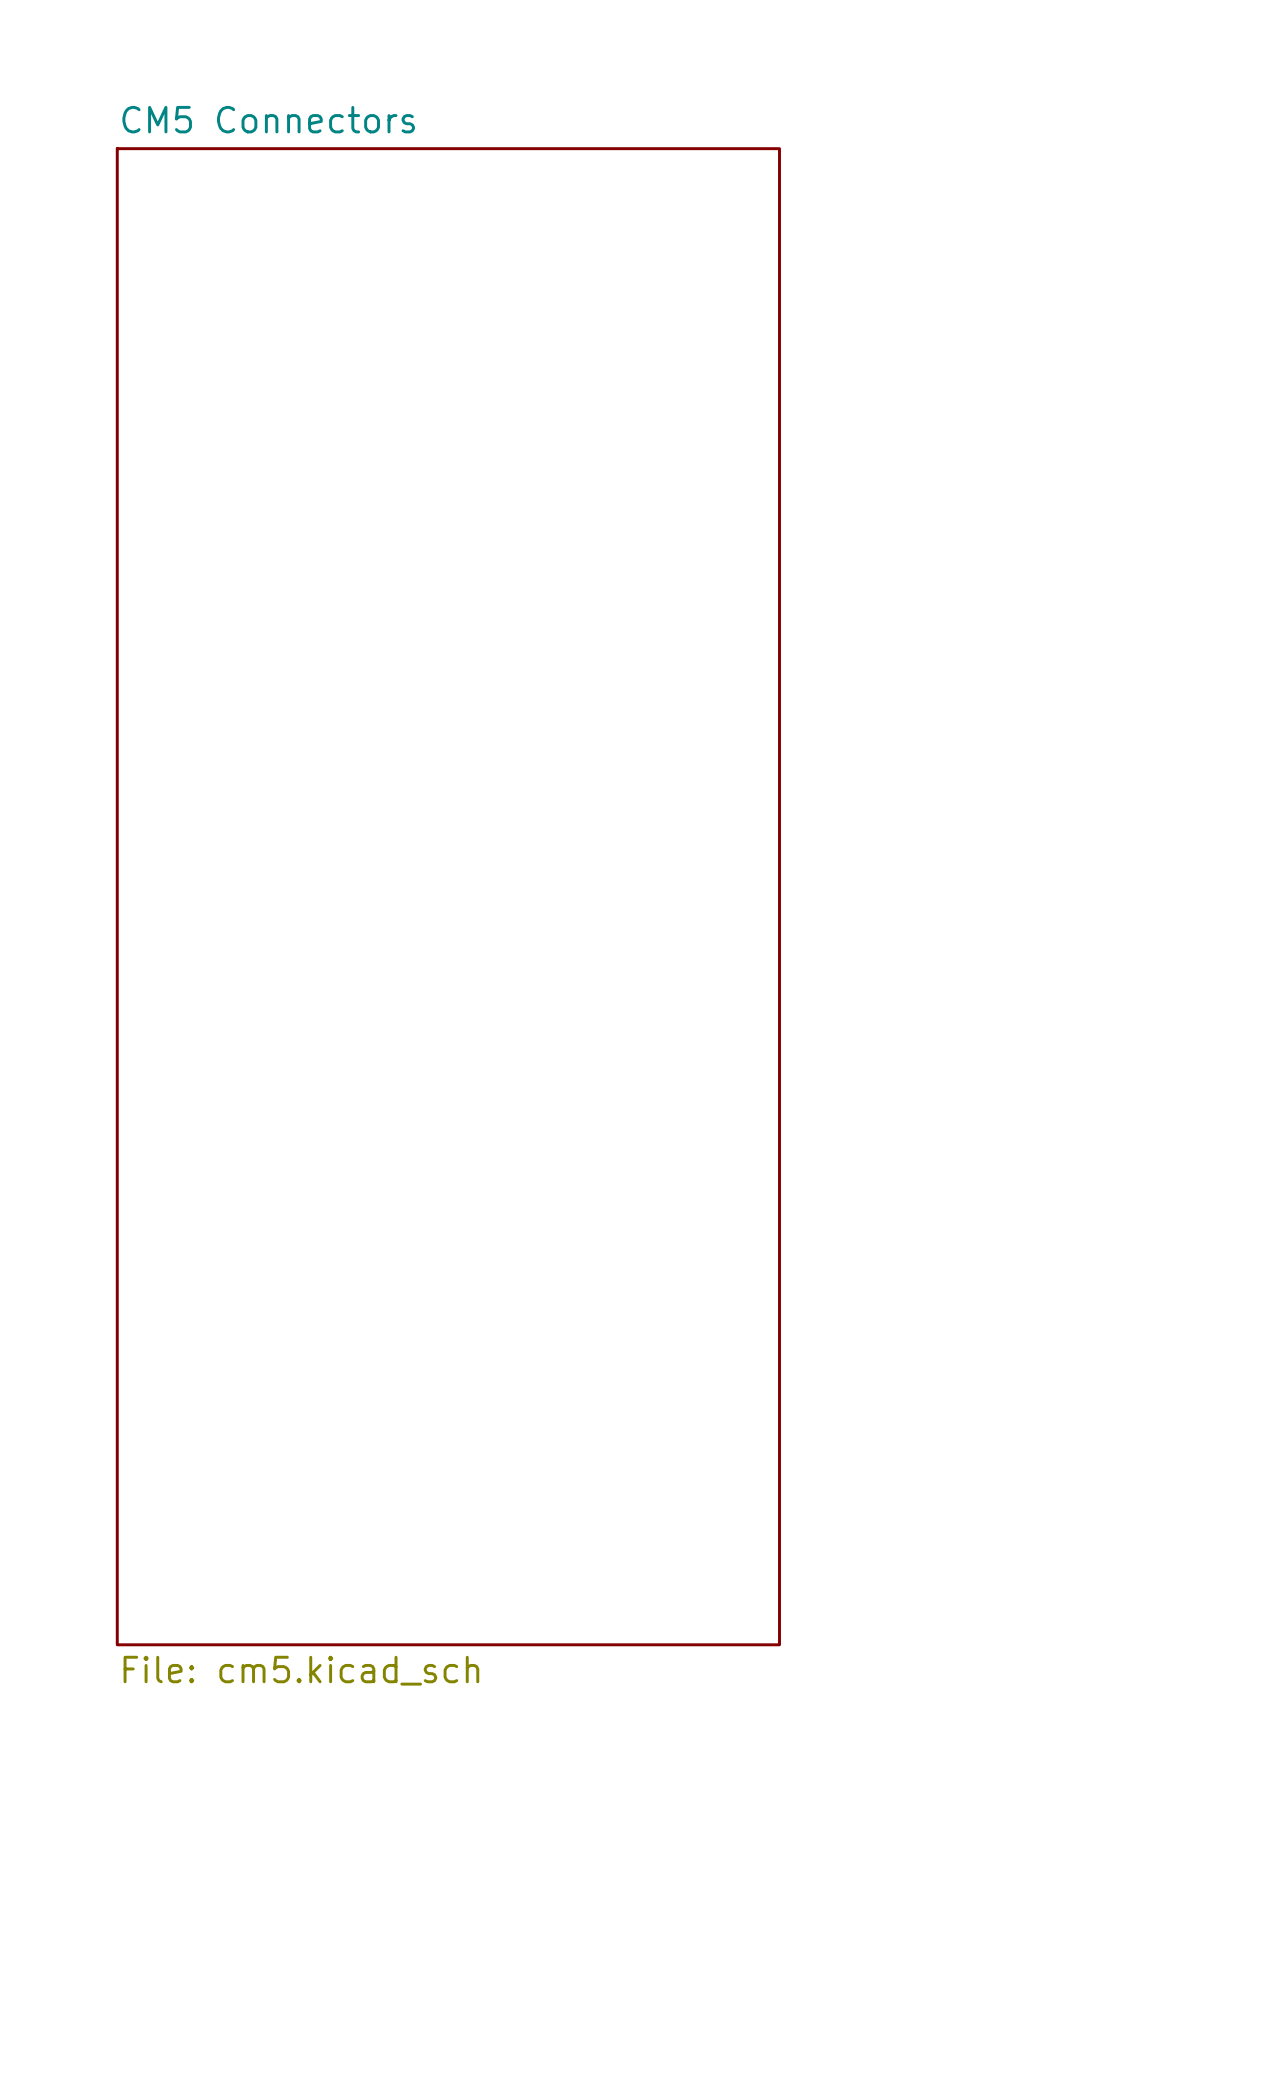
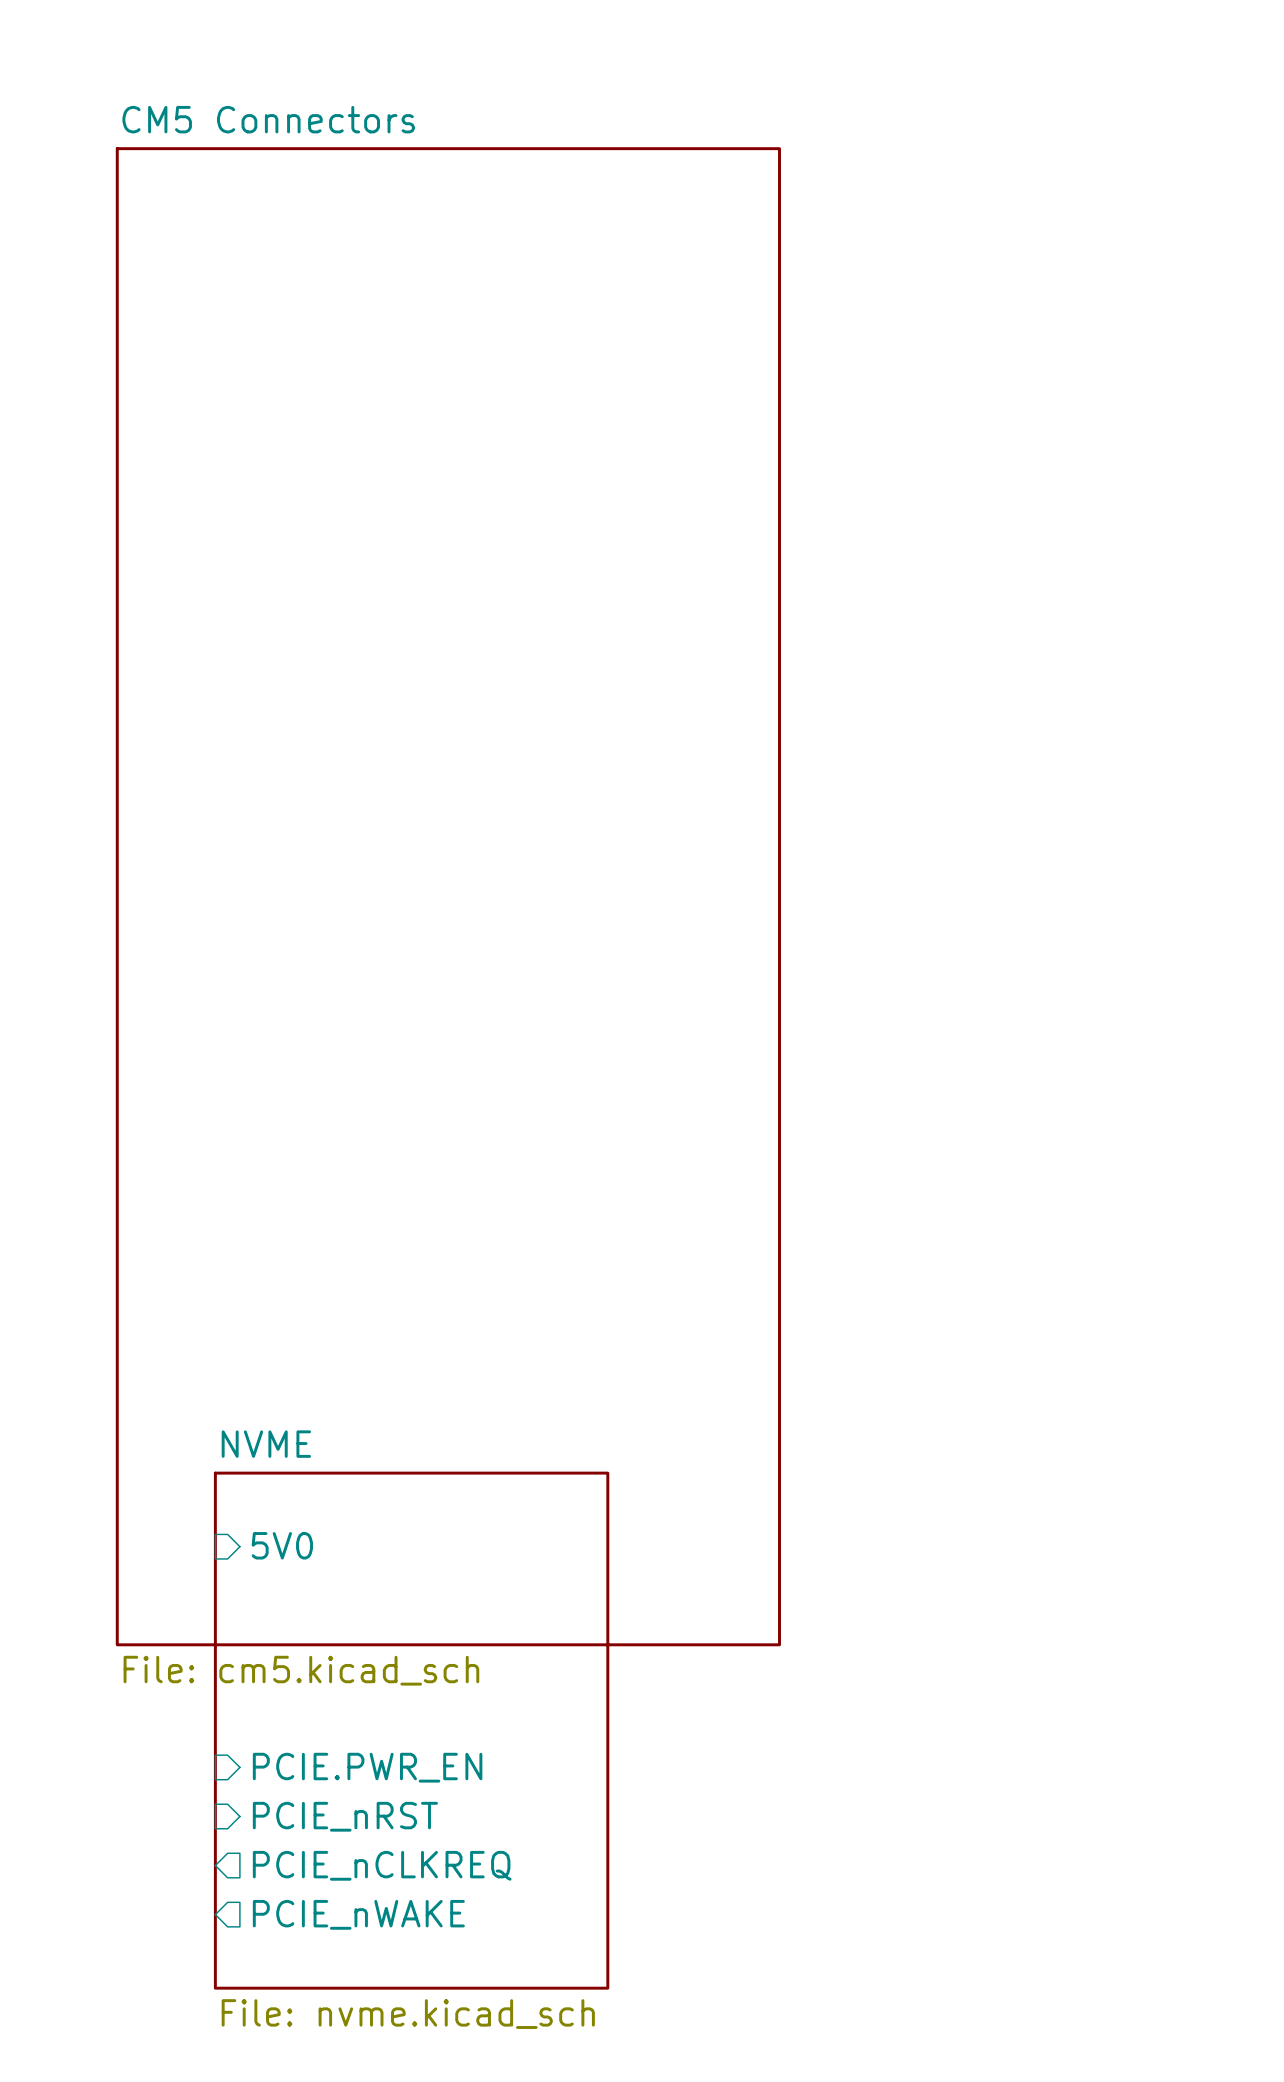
sheet pin: none -> 5V0 (282, 1545)
sheet NVME: none -> File: nvme.kicad_sch (411, 1730)
sheet pin: none -> PCIE.PWR_EN (367, 1767)
sheet pin: none -> PCIE_nRST (345, 1816)
sheet pin: none -> PCIE_nCLKREQ (382, 1865)
sheet pin: none -> PCIE_nWAKE (358, 1914)

